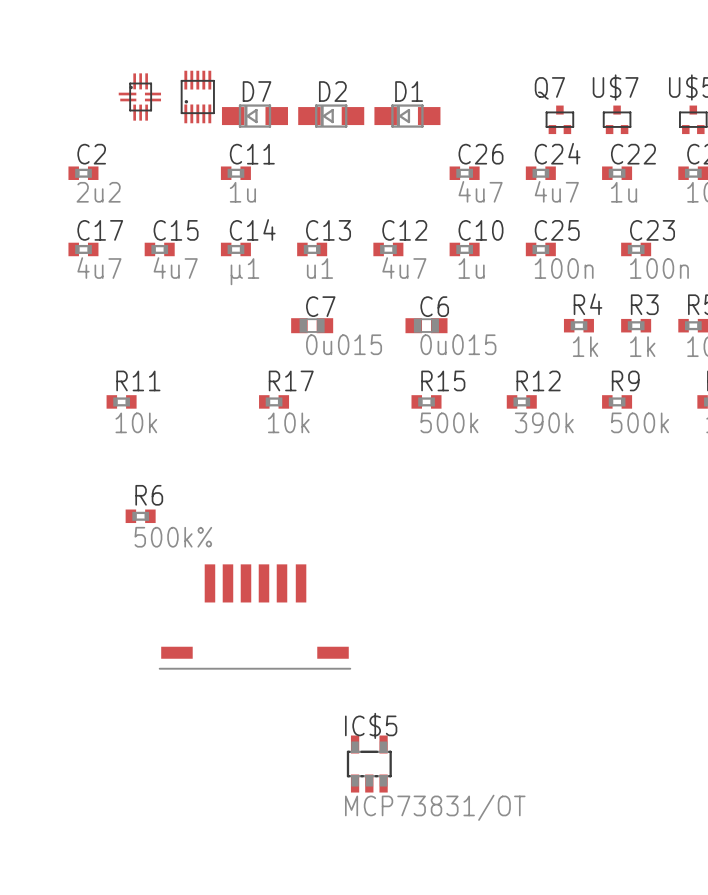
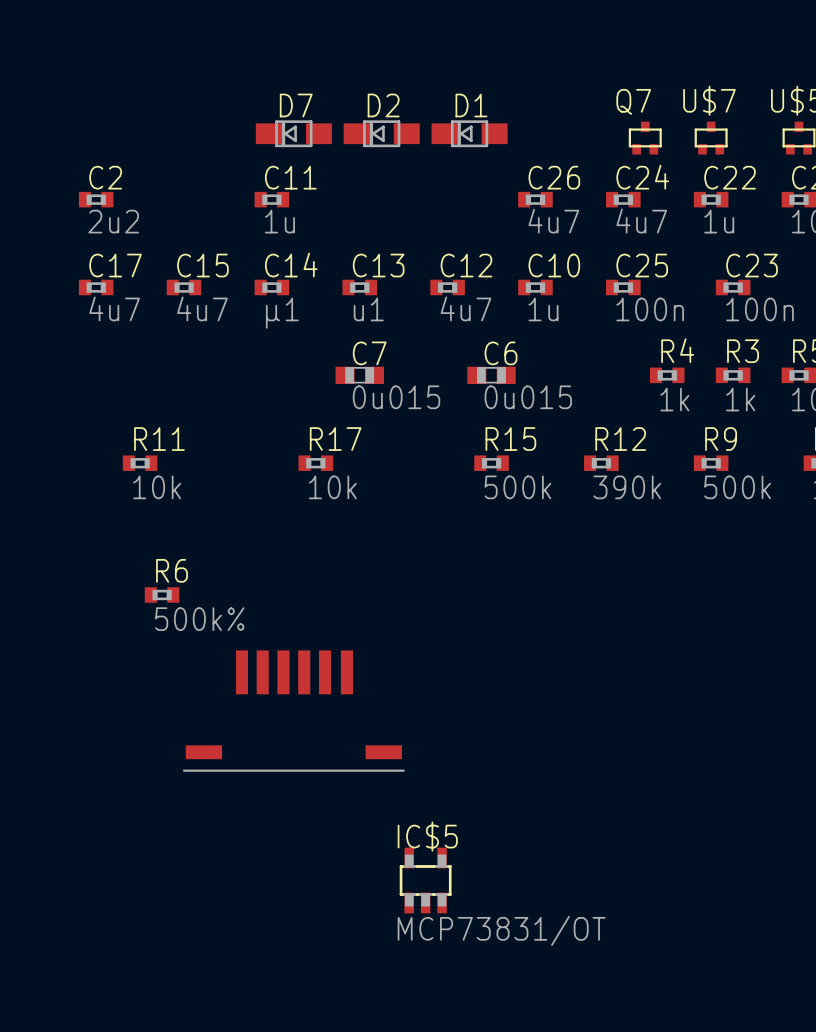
part: (139, 97) -> none
part: (197, 97) -> none

